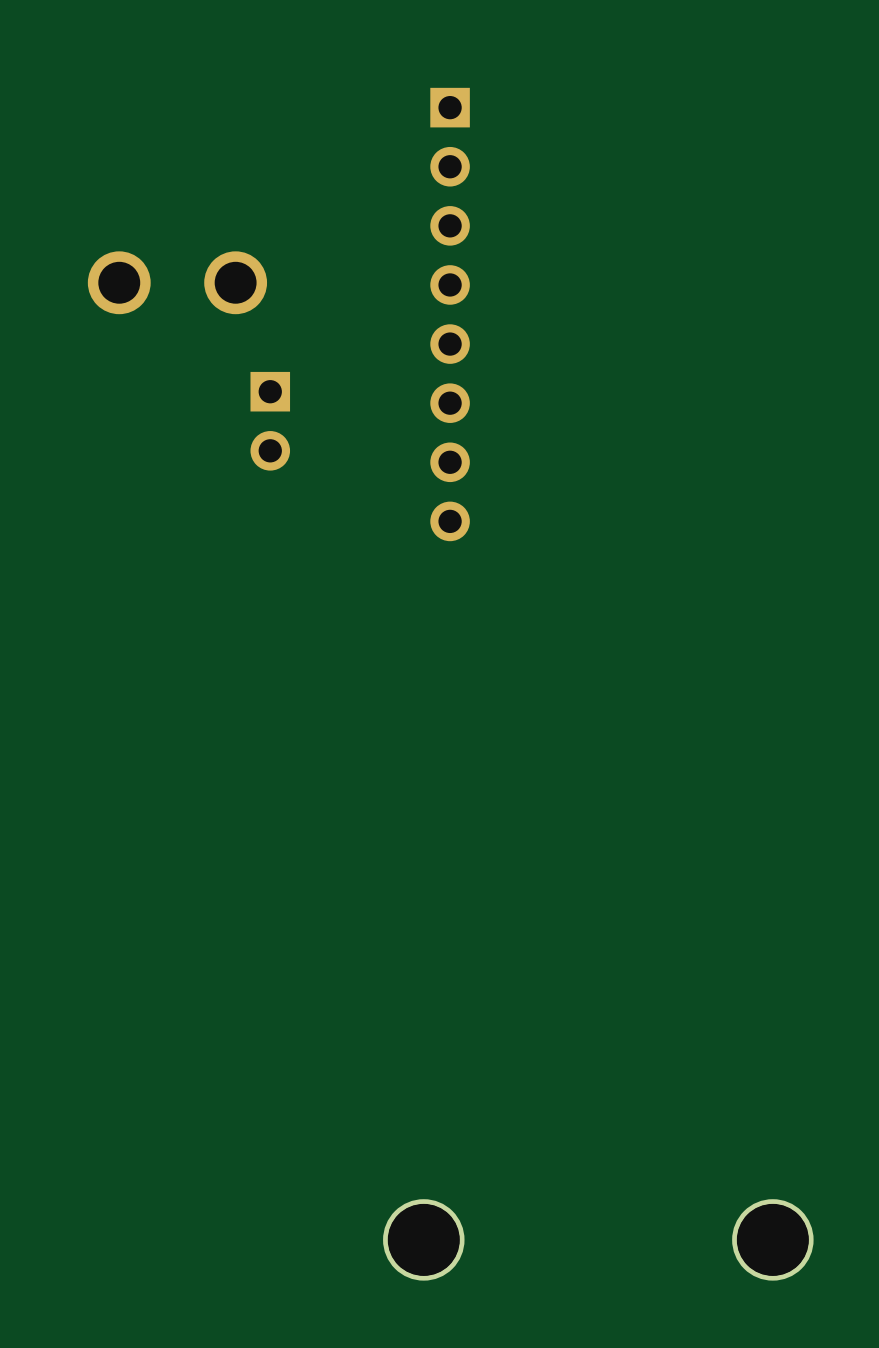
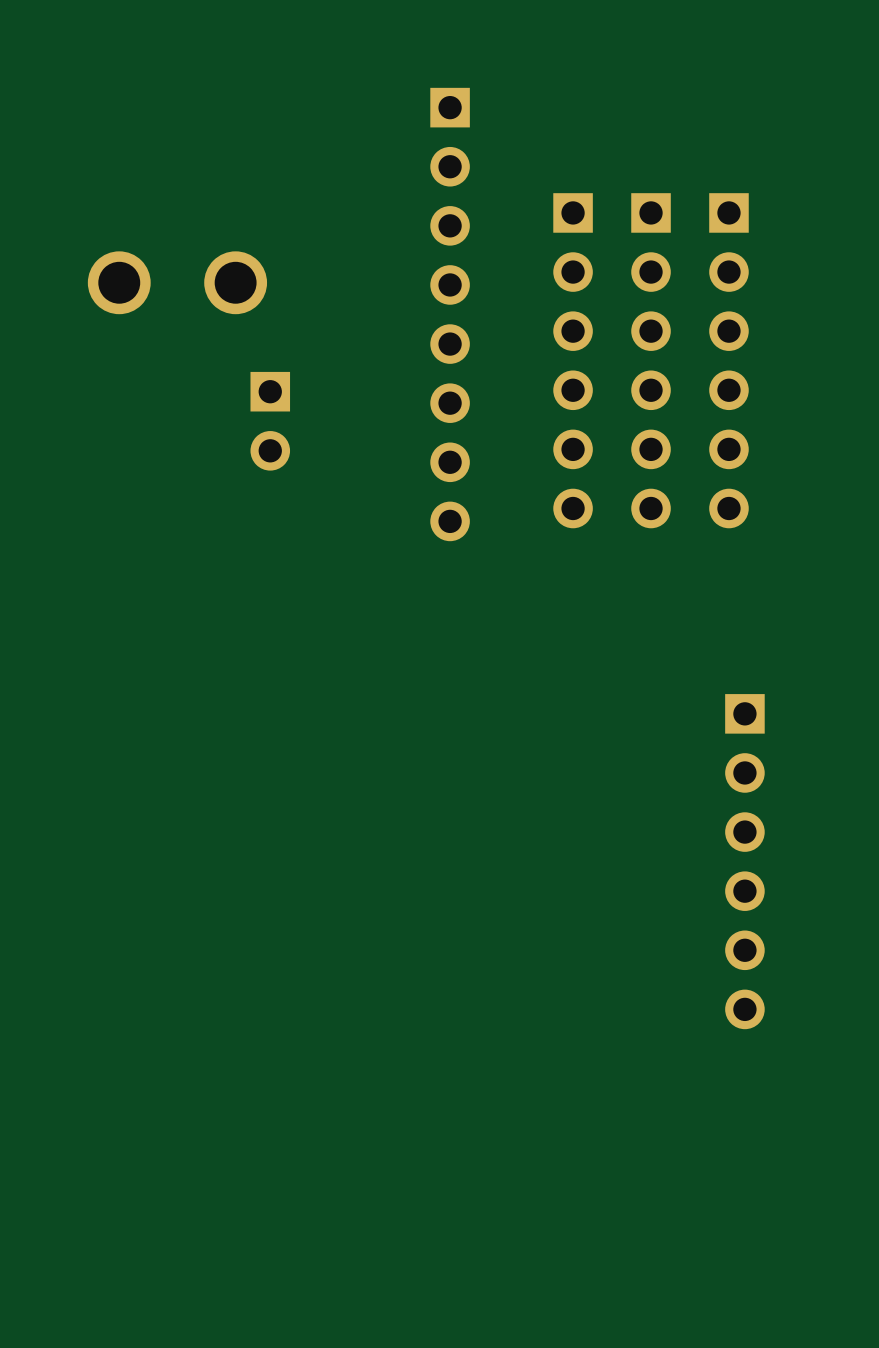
part: none -> (573, 360)
part: none -> (651, 360)
part: none -> (728, 360)
part: none -> (744, 861)
round board edge: [383, 1199, 465, 1281] -> none
round board edge: [732, 1199, 814, 1281] -> none
part: (423, 1239) -> none
part: (772, 1239) -> none

